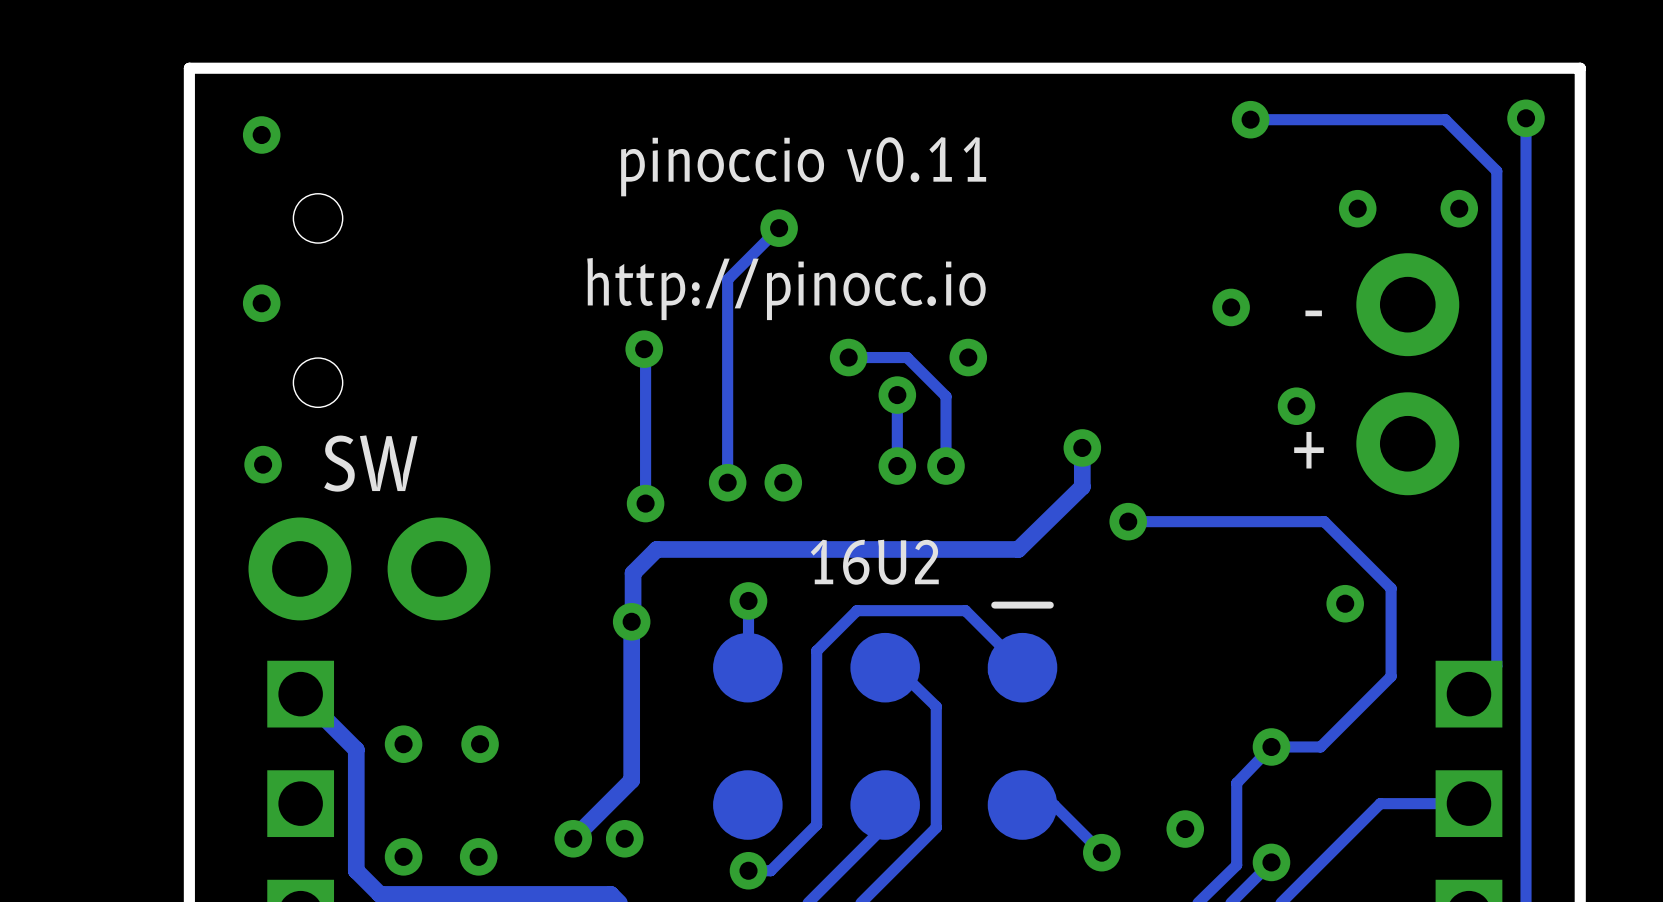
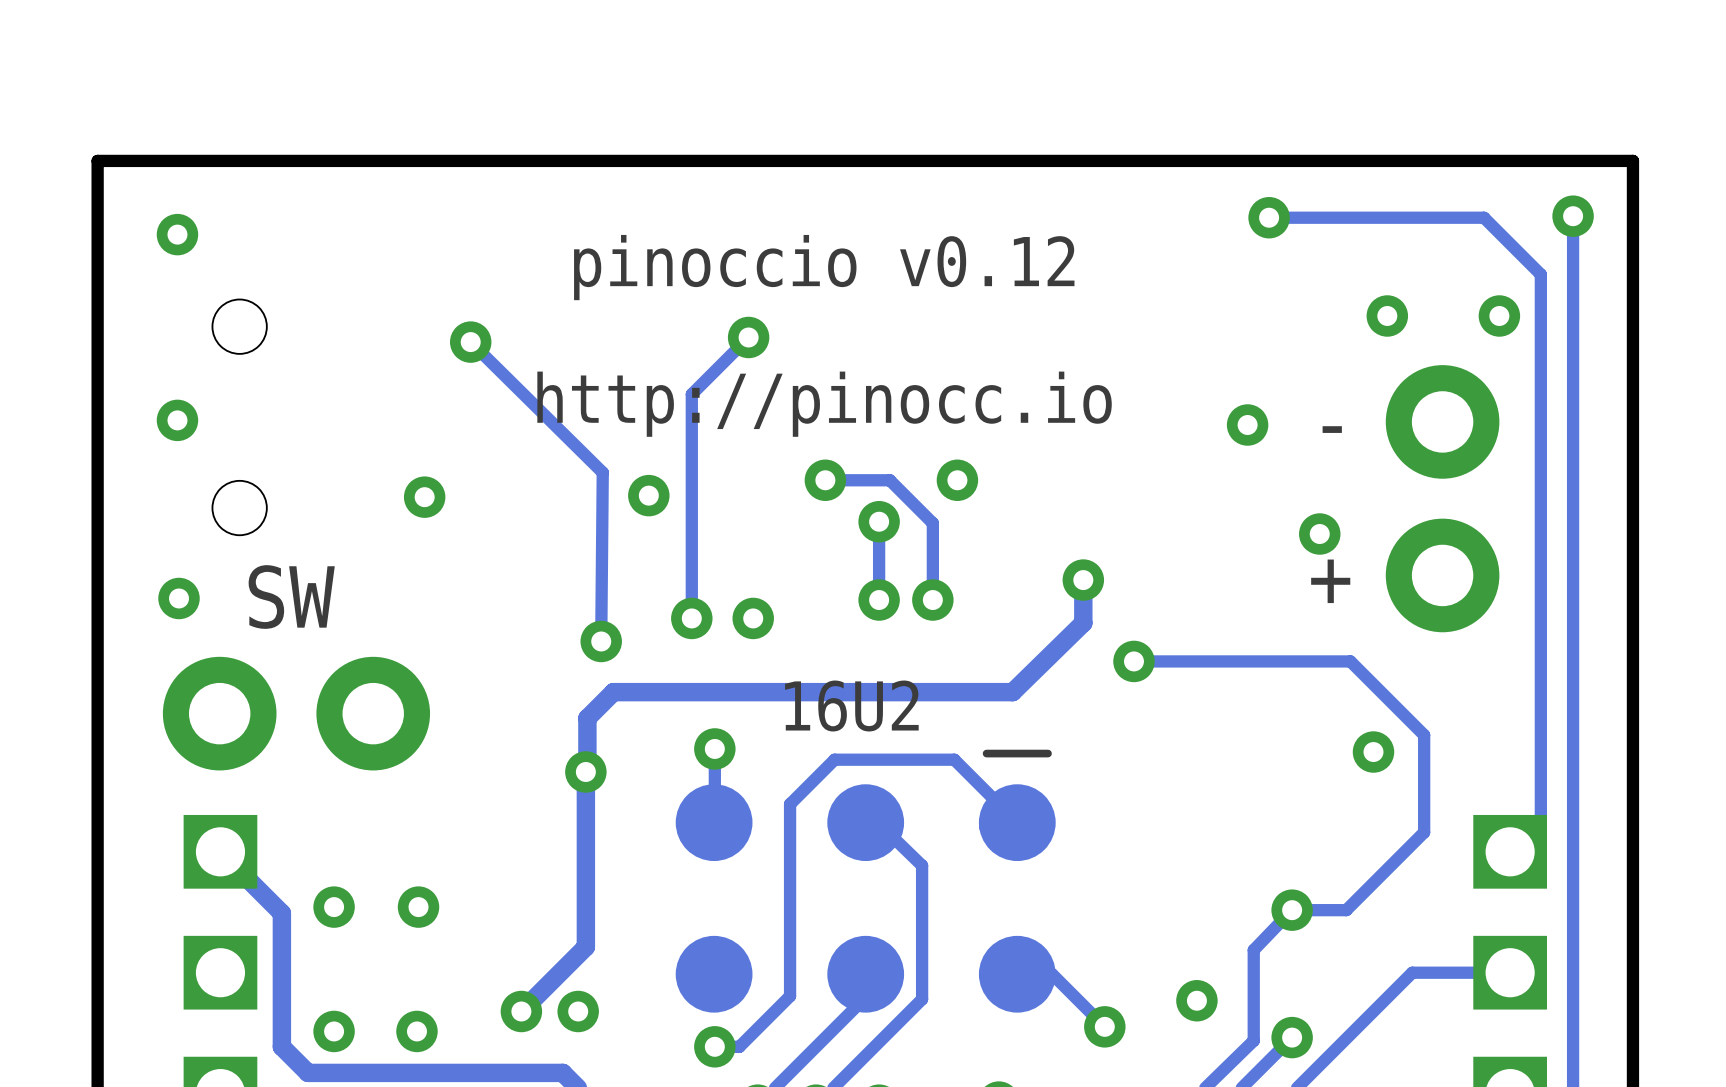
text: pinoccio v0.11 (803, 166) -> pinoccio v0.12 (824, 267)
via: none -> (470, 342)
track: (644, 349) (645, 503) -> (470, 342) (602, 472) (601, 641)
via position: (644, 349) -> (648, 495)
via: none -> (424, 497)

